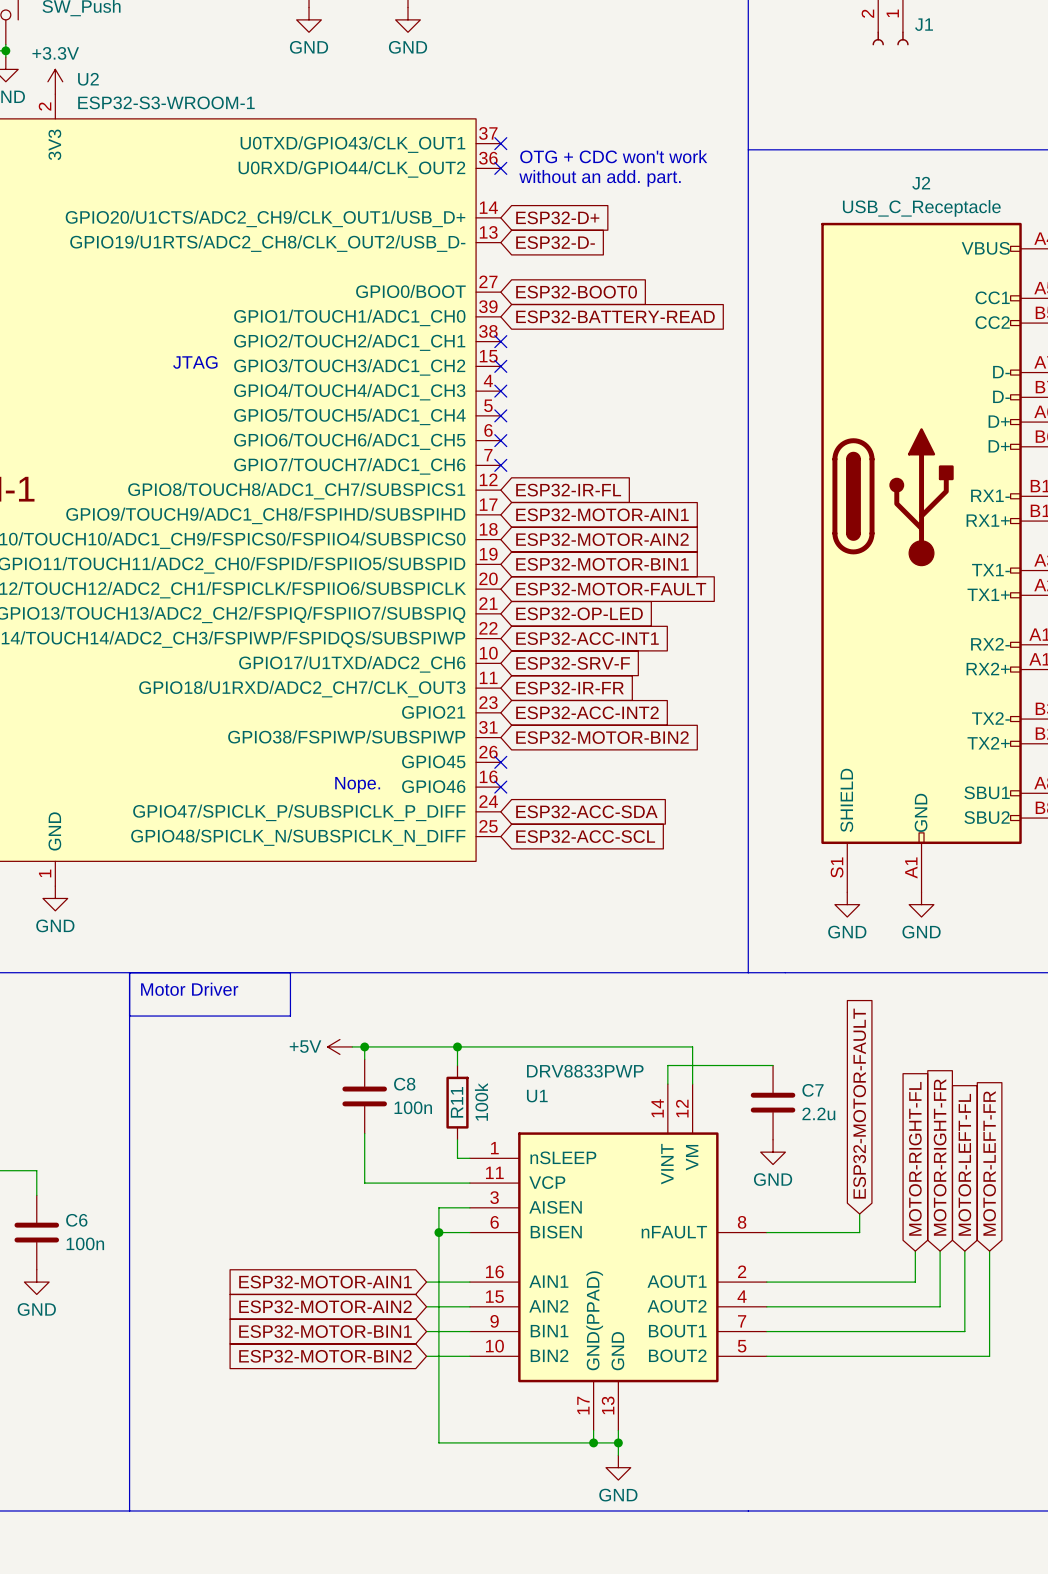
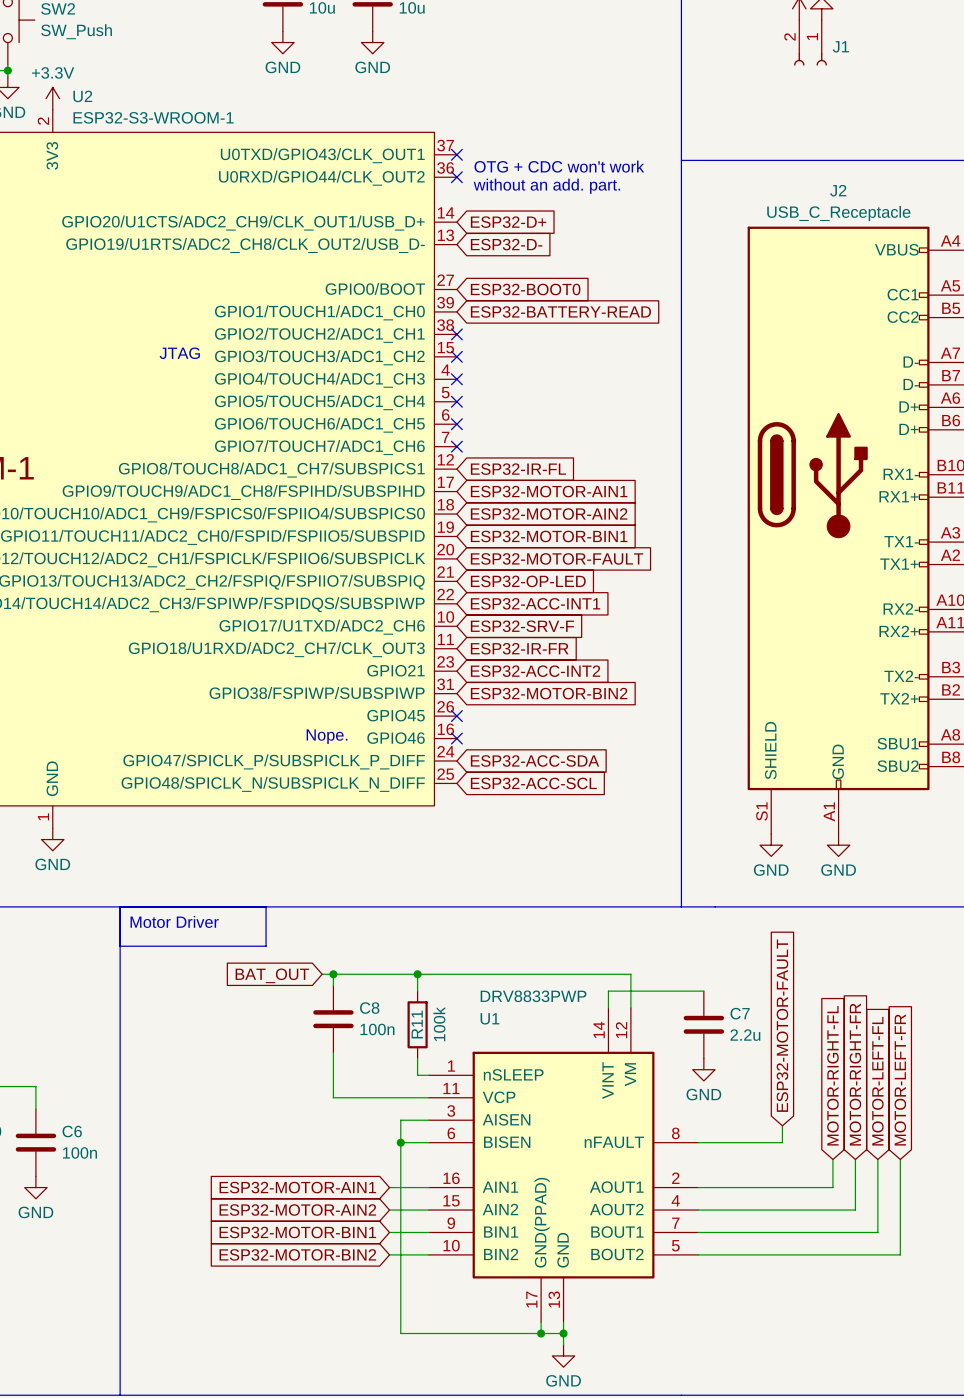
power symbol: +5V (339, 1046) -> none
global label: none -> BAT_OUT (272, 975)

